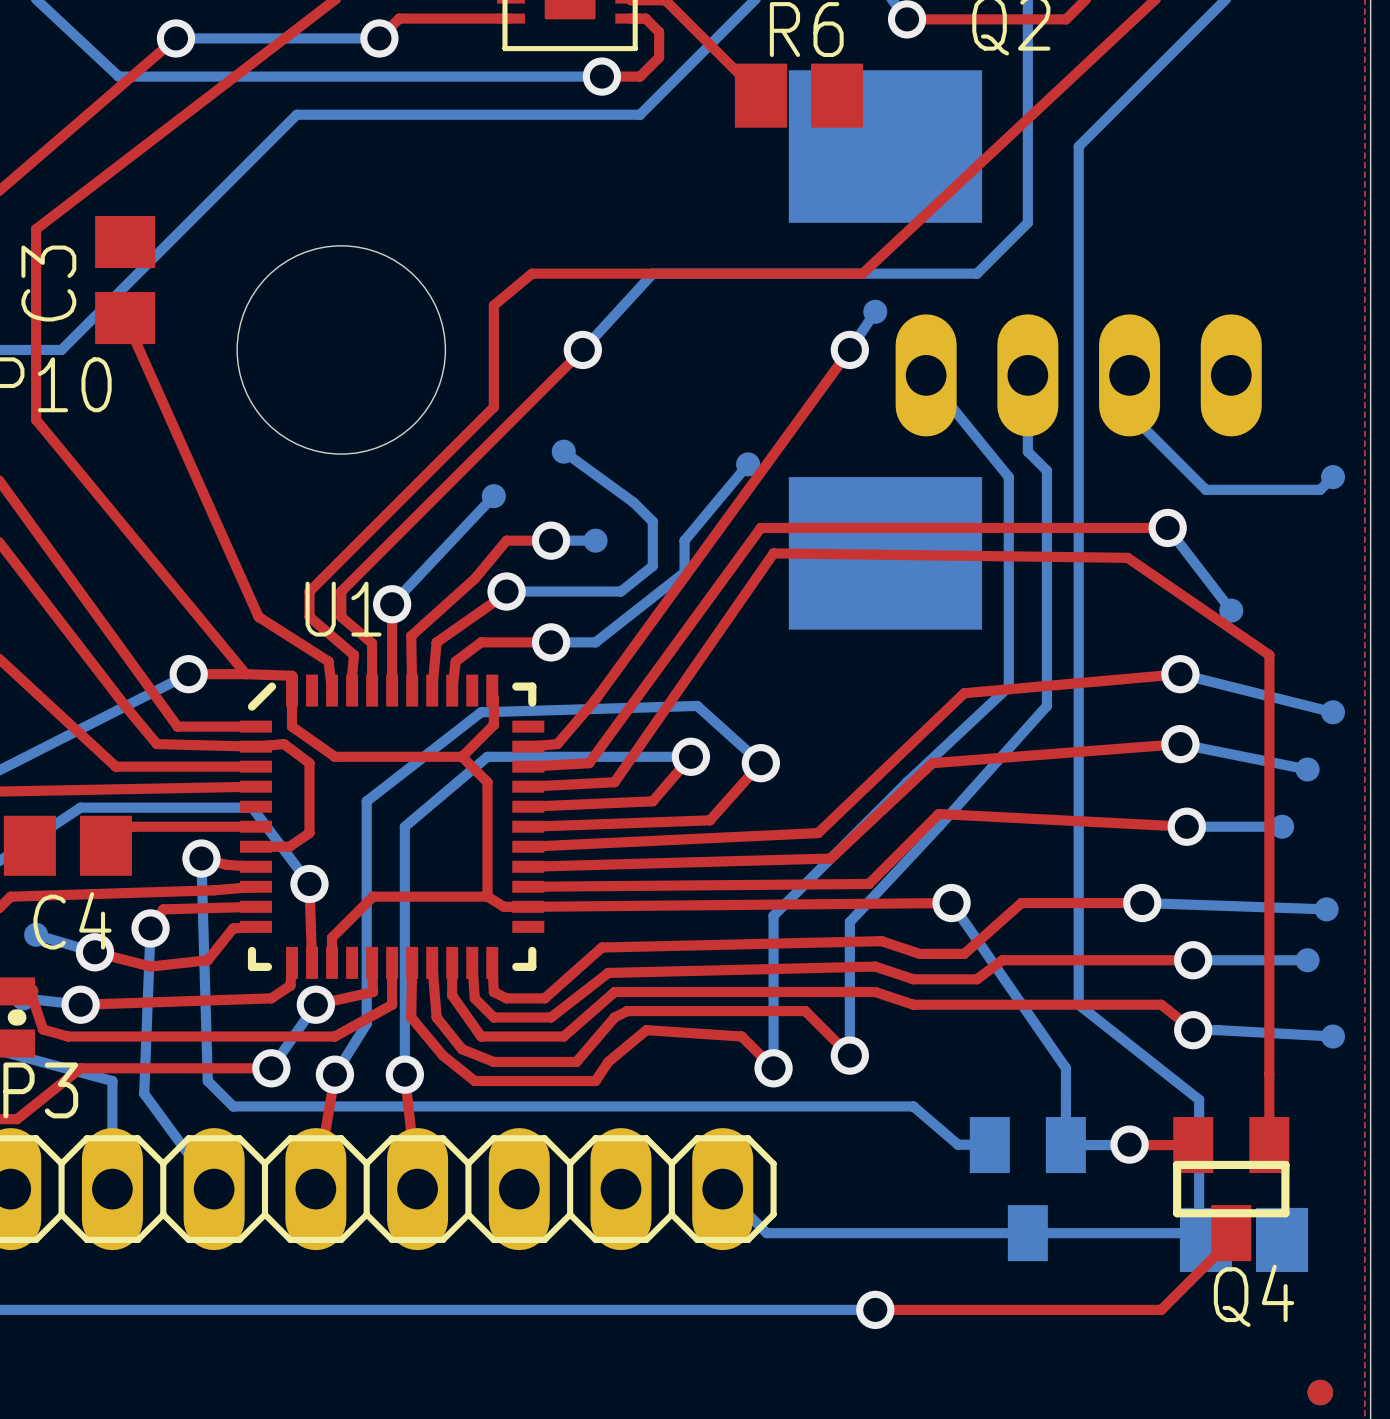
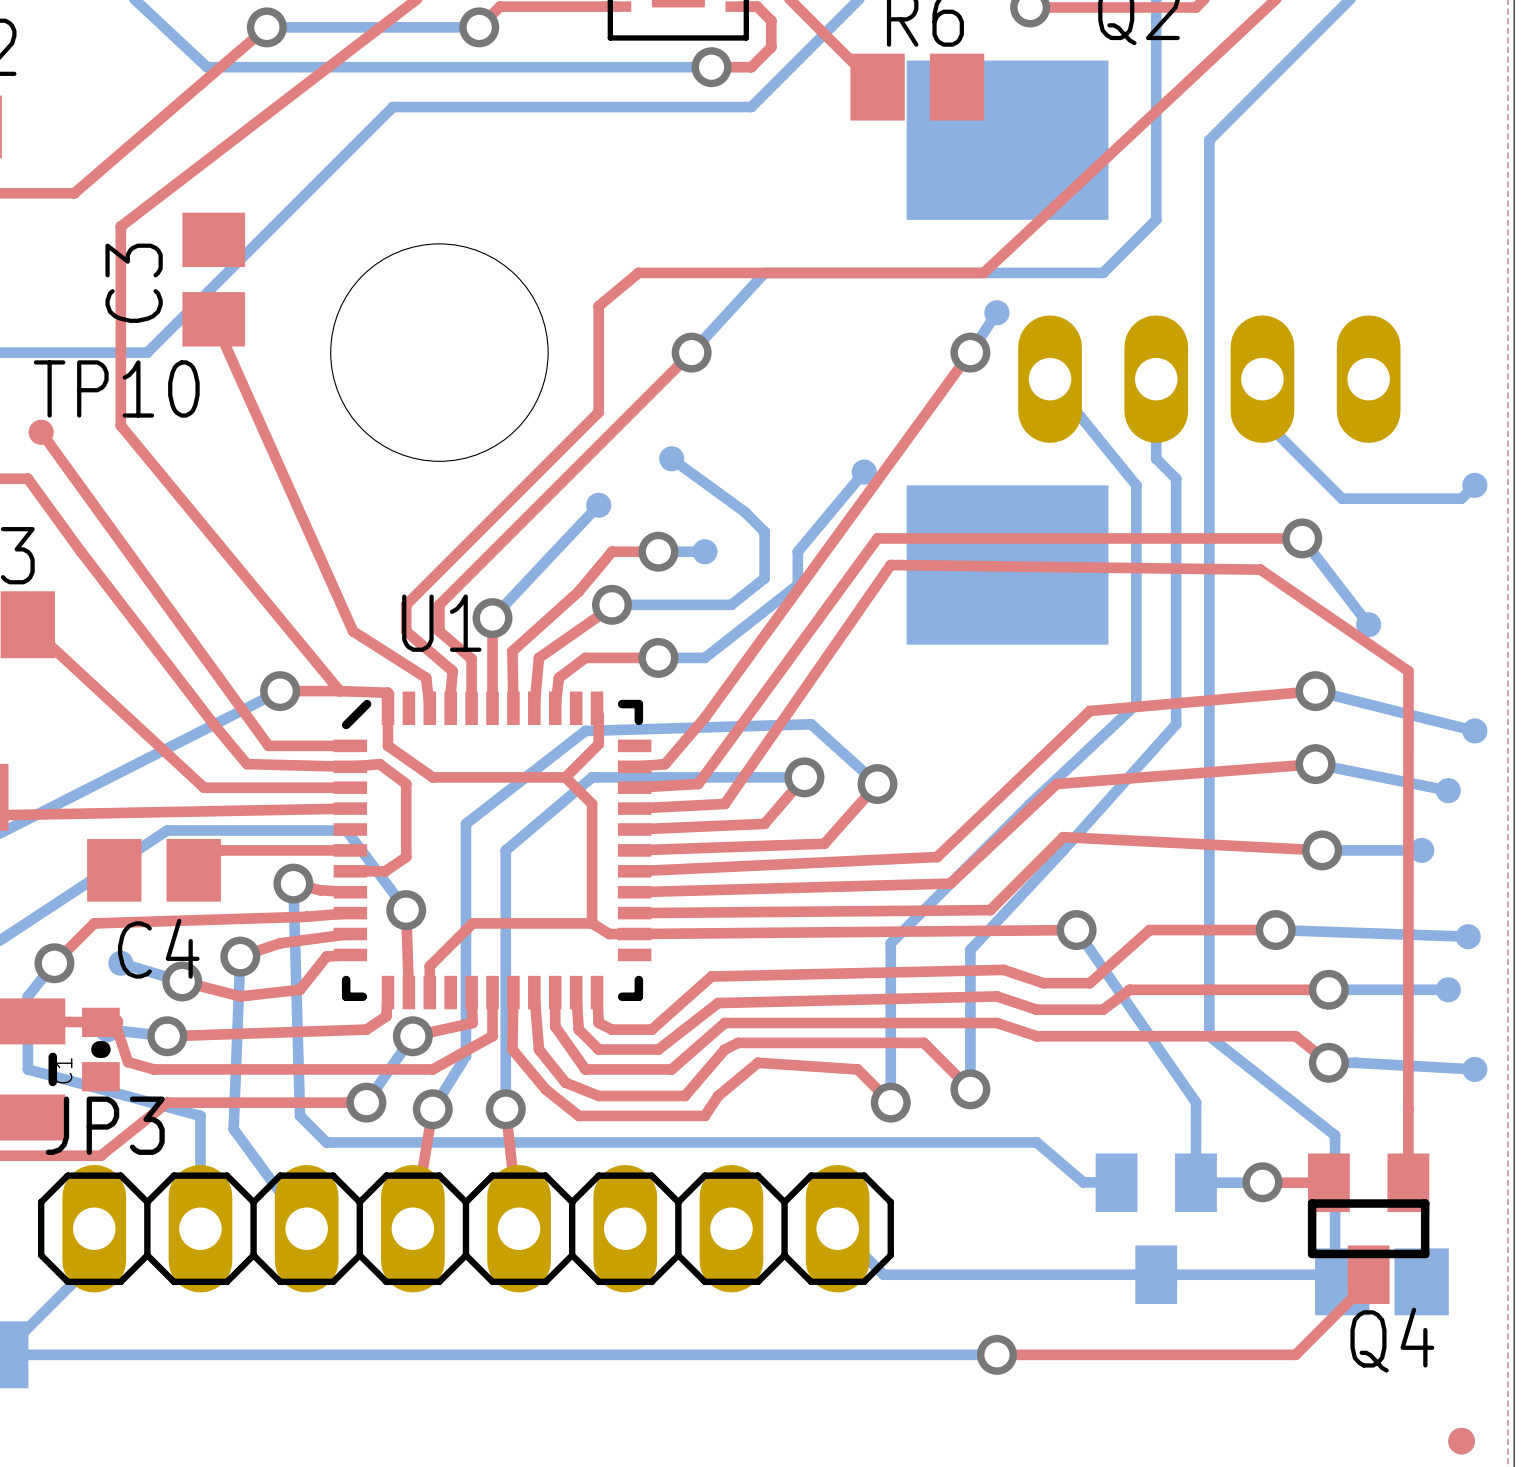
top track: (255, 906) (163, 909) (150, 928) -> (350, 934) (280, 943) (240, 956)

